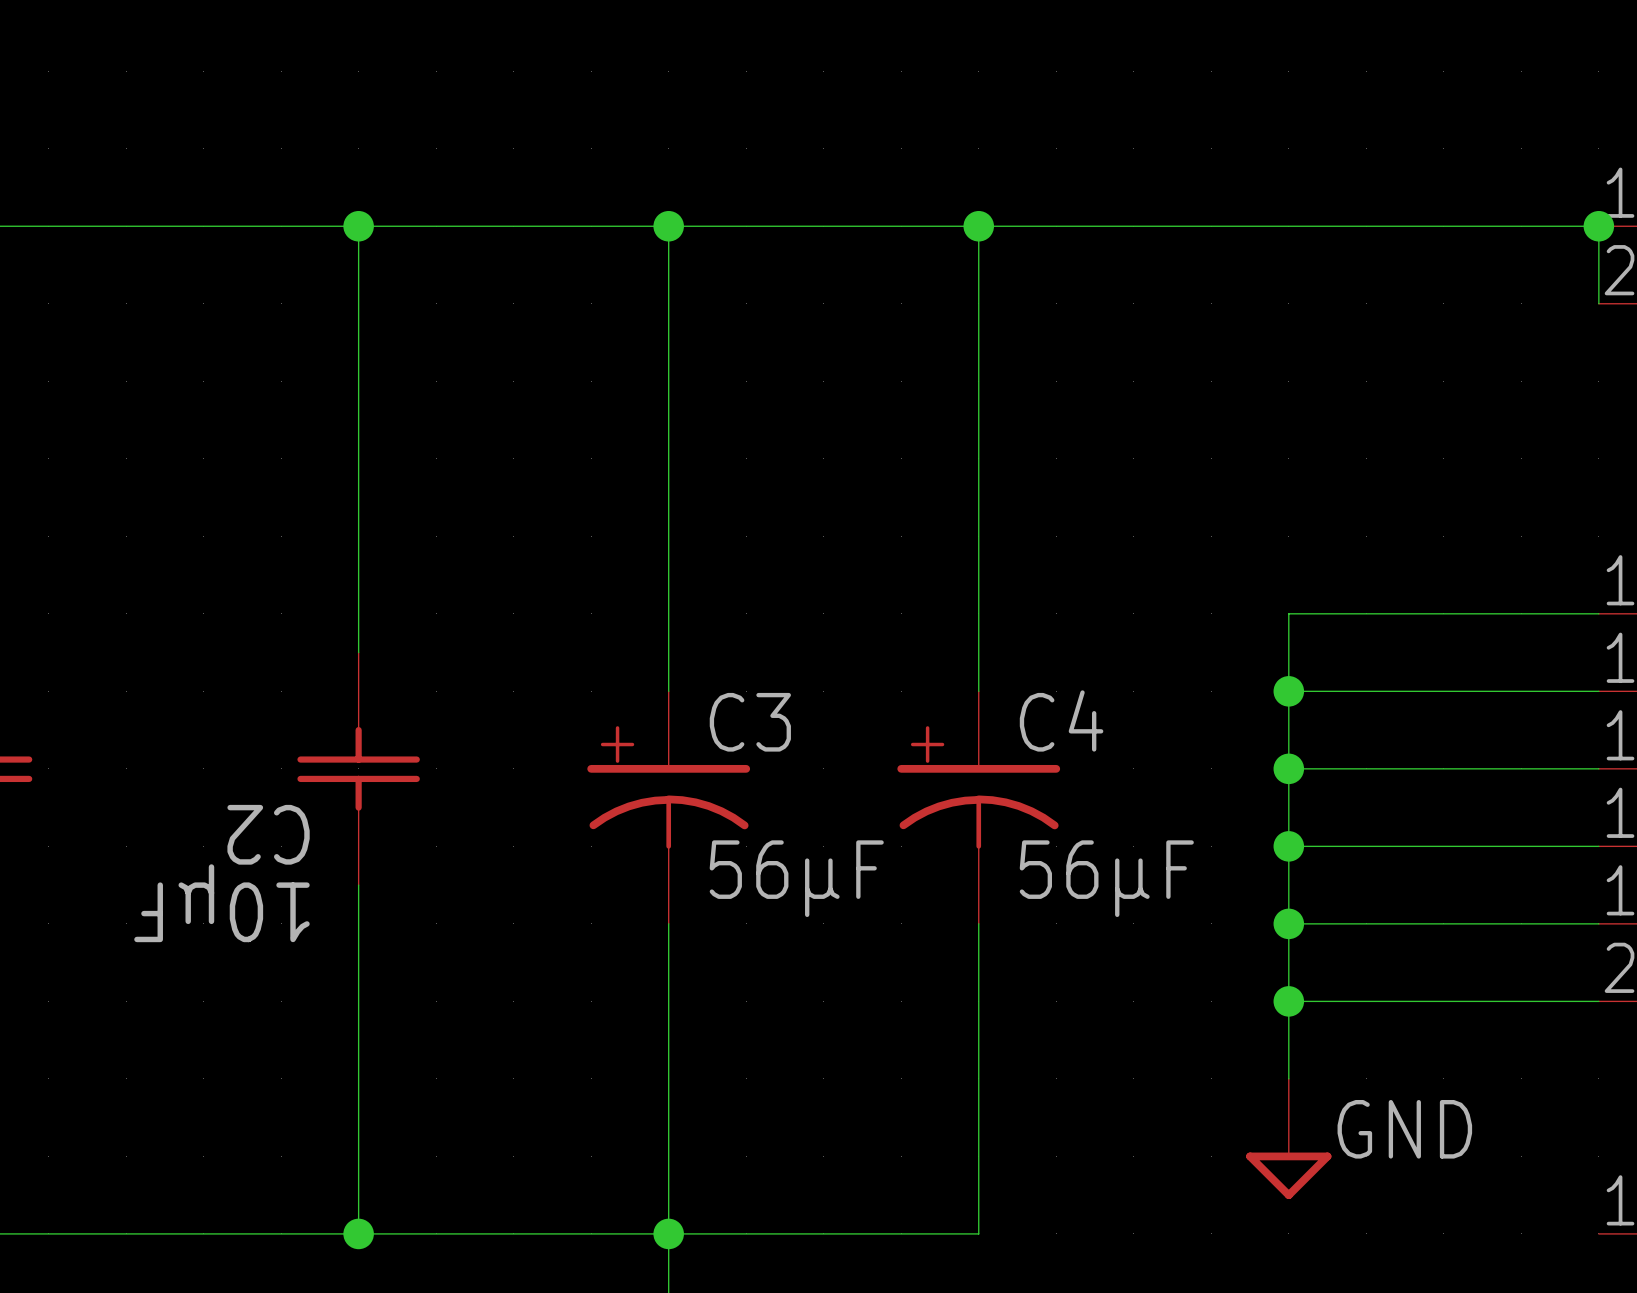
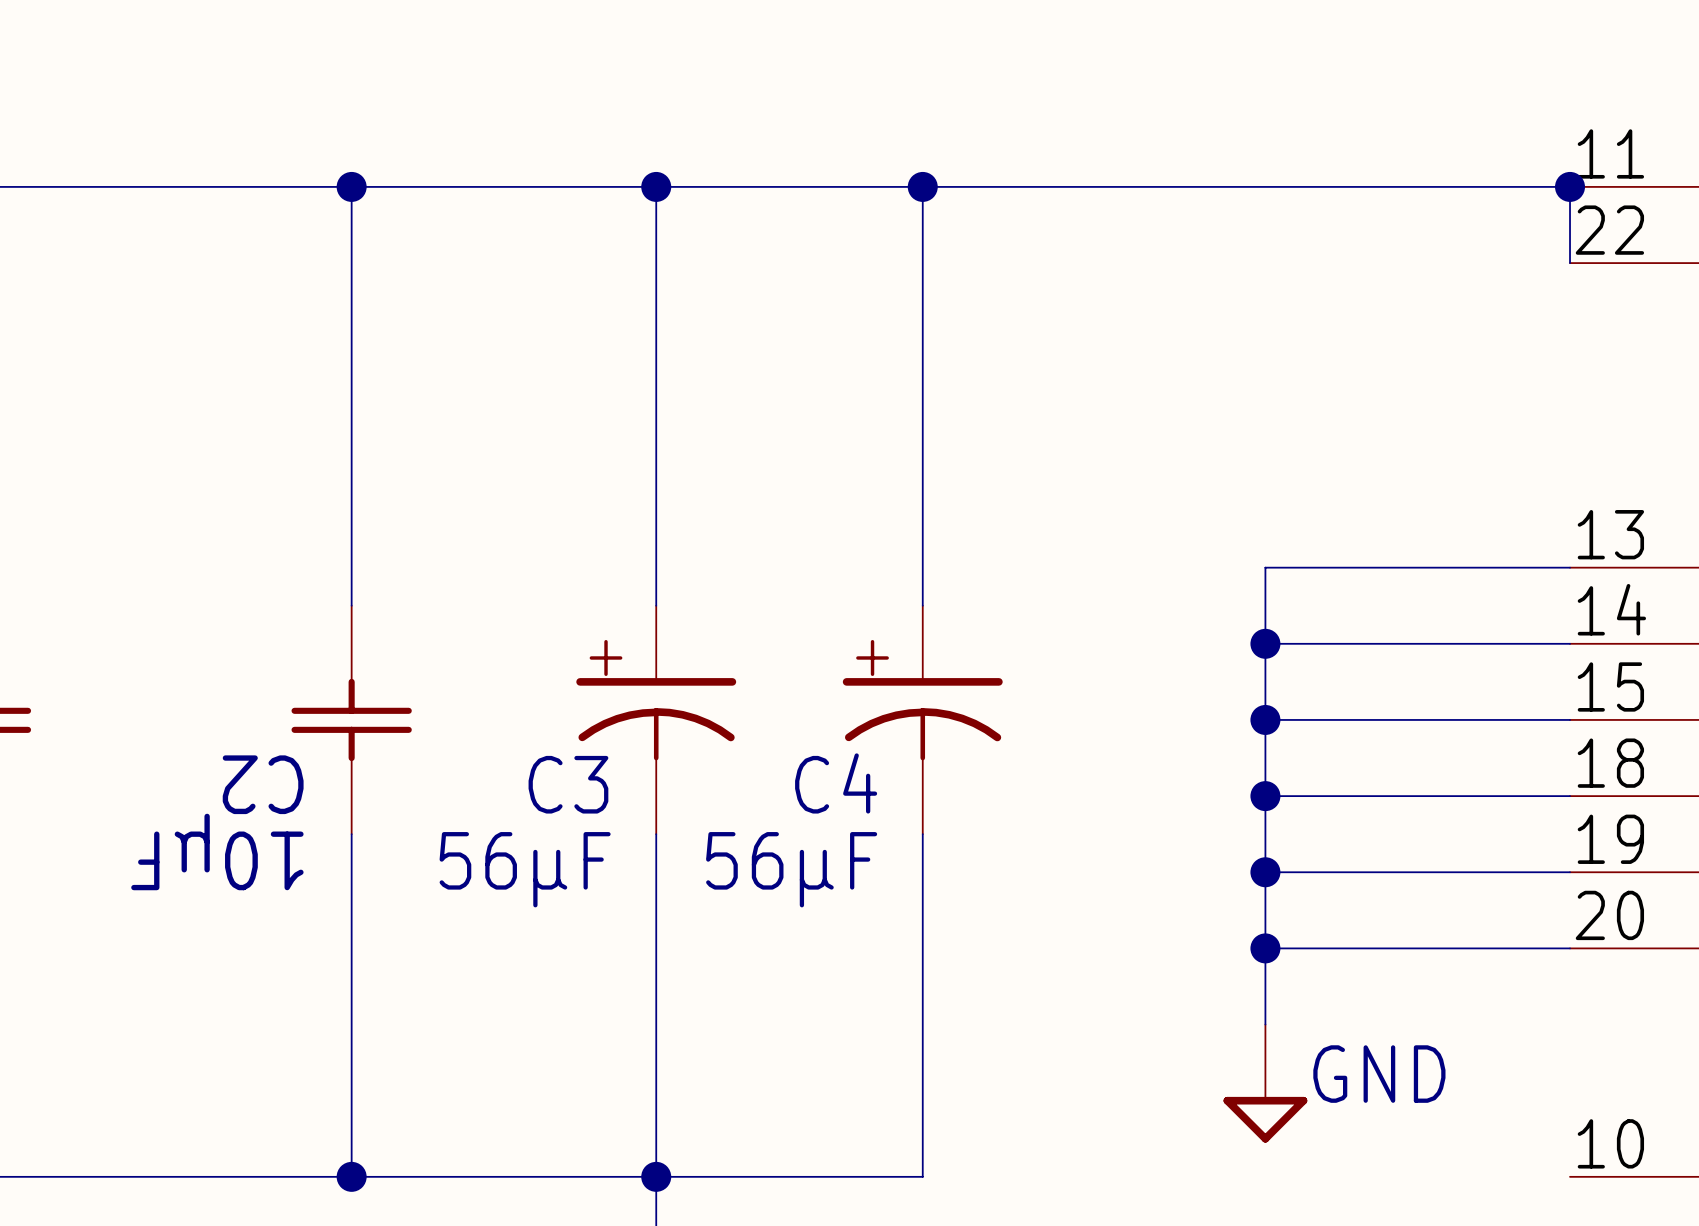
wire: none -> (922, 186) (922, 605)
wire: (978, 226) (978, 691) -> none
junction position: (978, 226) -> (922, 186)
C4 name position: C4 (1061, 720) -> C4 (836, 783)
C3 name position: C3 (750, 722) -> C3 (568, 784)
C3 position: (668, 807) -> (656, 719)
C4 position: (978, 807) -> (922, 719)
C3 value position: 56µF (796, 878) -> 56µF (525, 869)
C4 value position: 56µF (1106, 878) -> 56µF (791, 869)
wire: (978, 923) (978, 1233) (939, 1233) -> (922, 834) (922, 1176)

